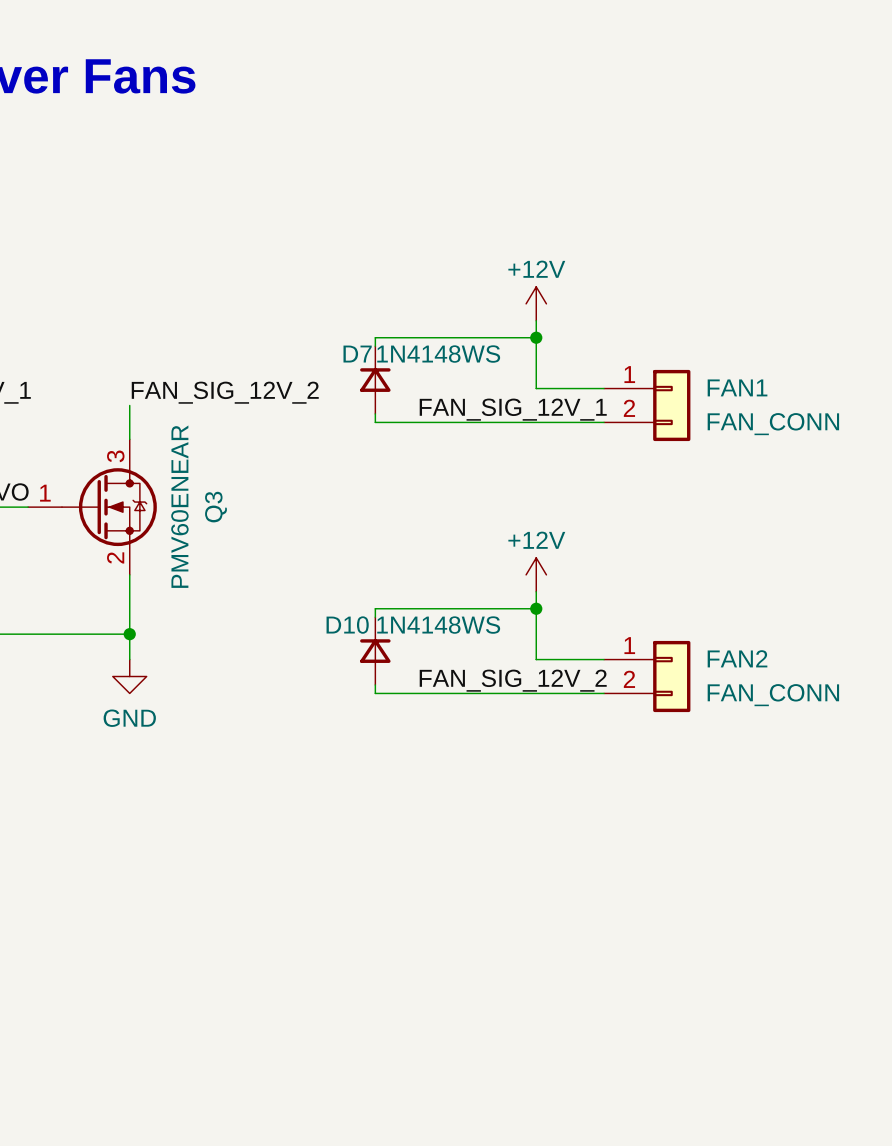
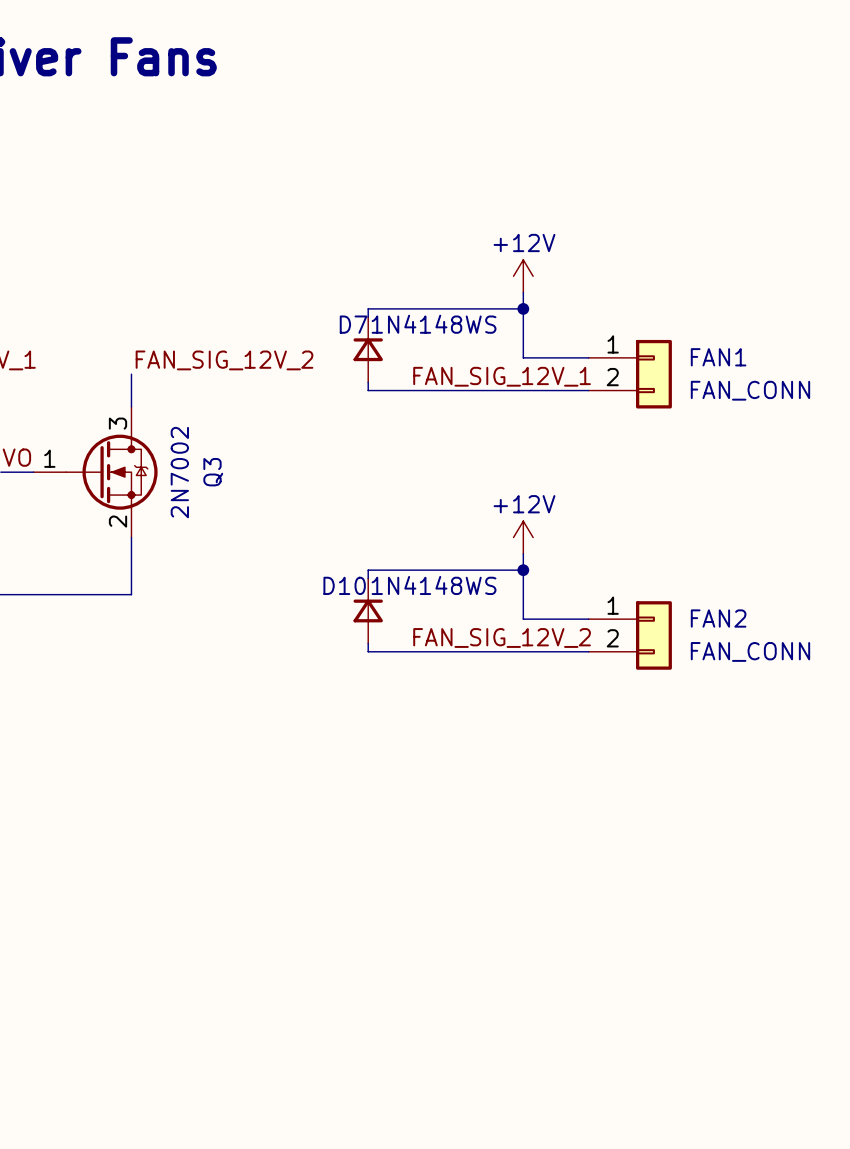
Q3 value: PMV60ENEAR (179, 506) -> 2N7002 (179, 472)
wire: (129, 634) (129, 659) -> none
junction: (129, 634) -> none
power symbol: GND (129, 676) -> none

